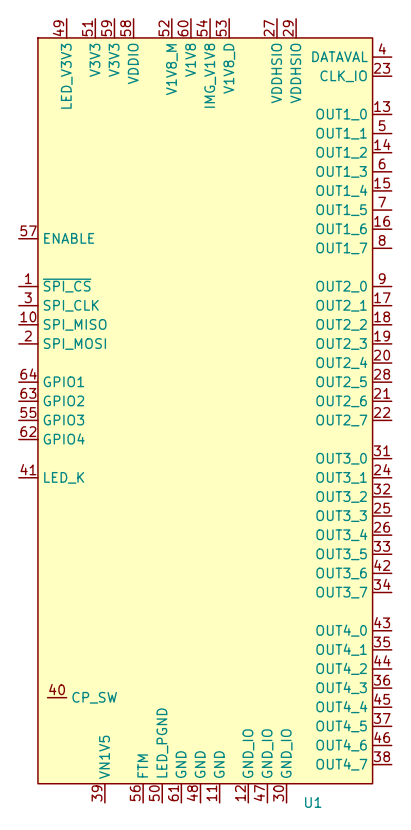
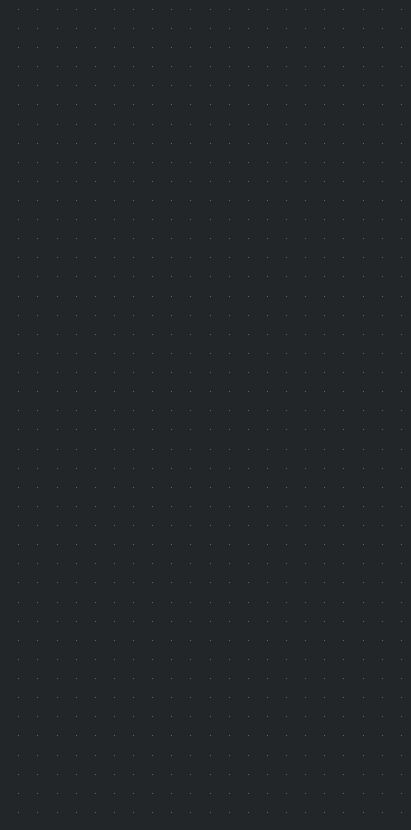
U1: (205, 410) -> none

